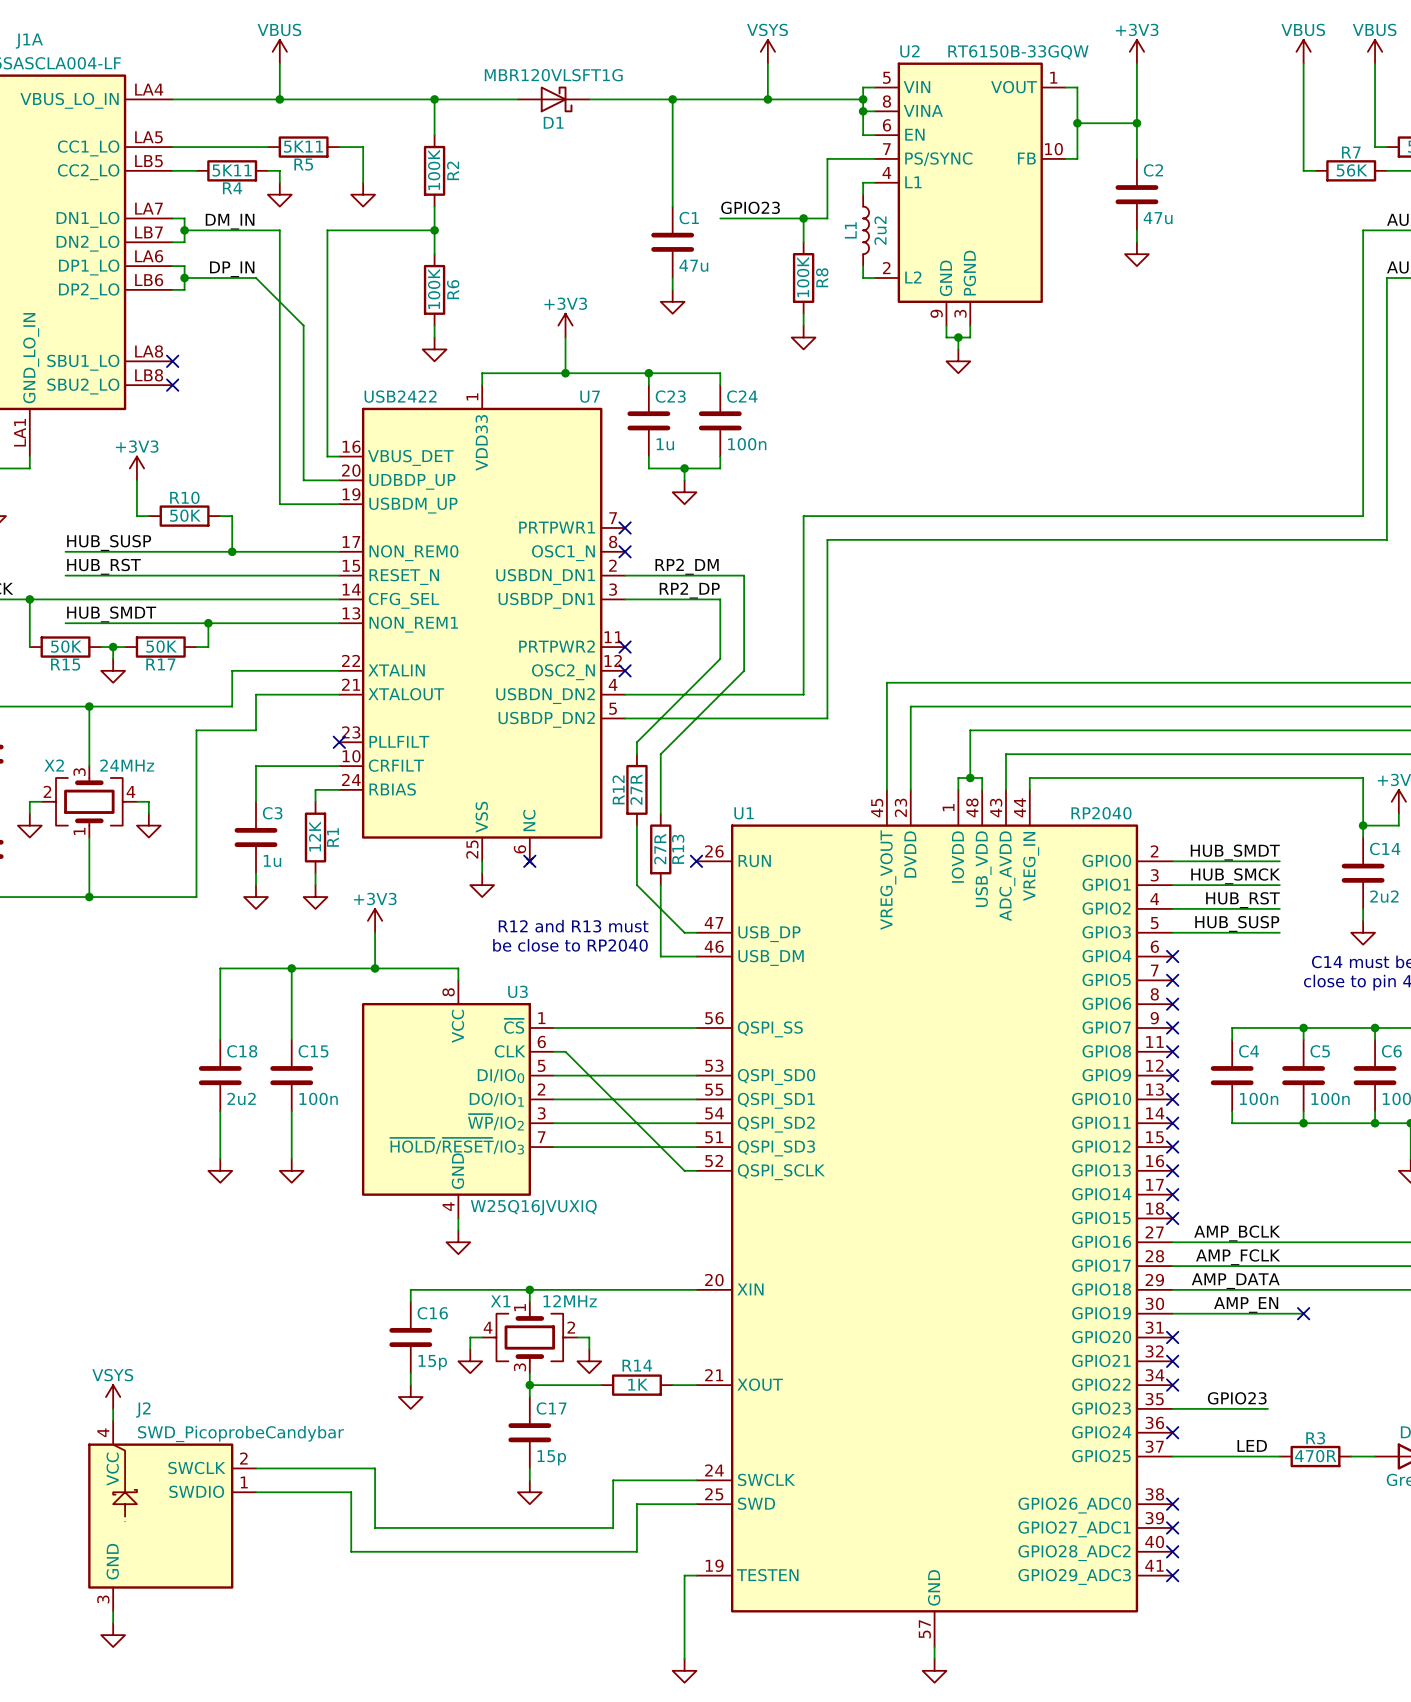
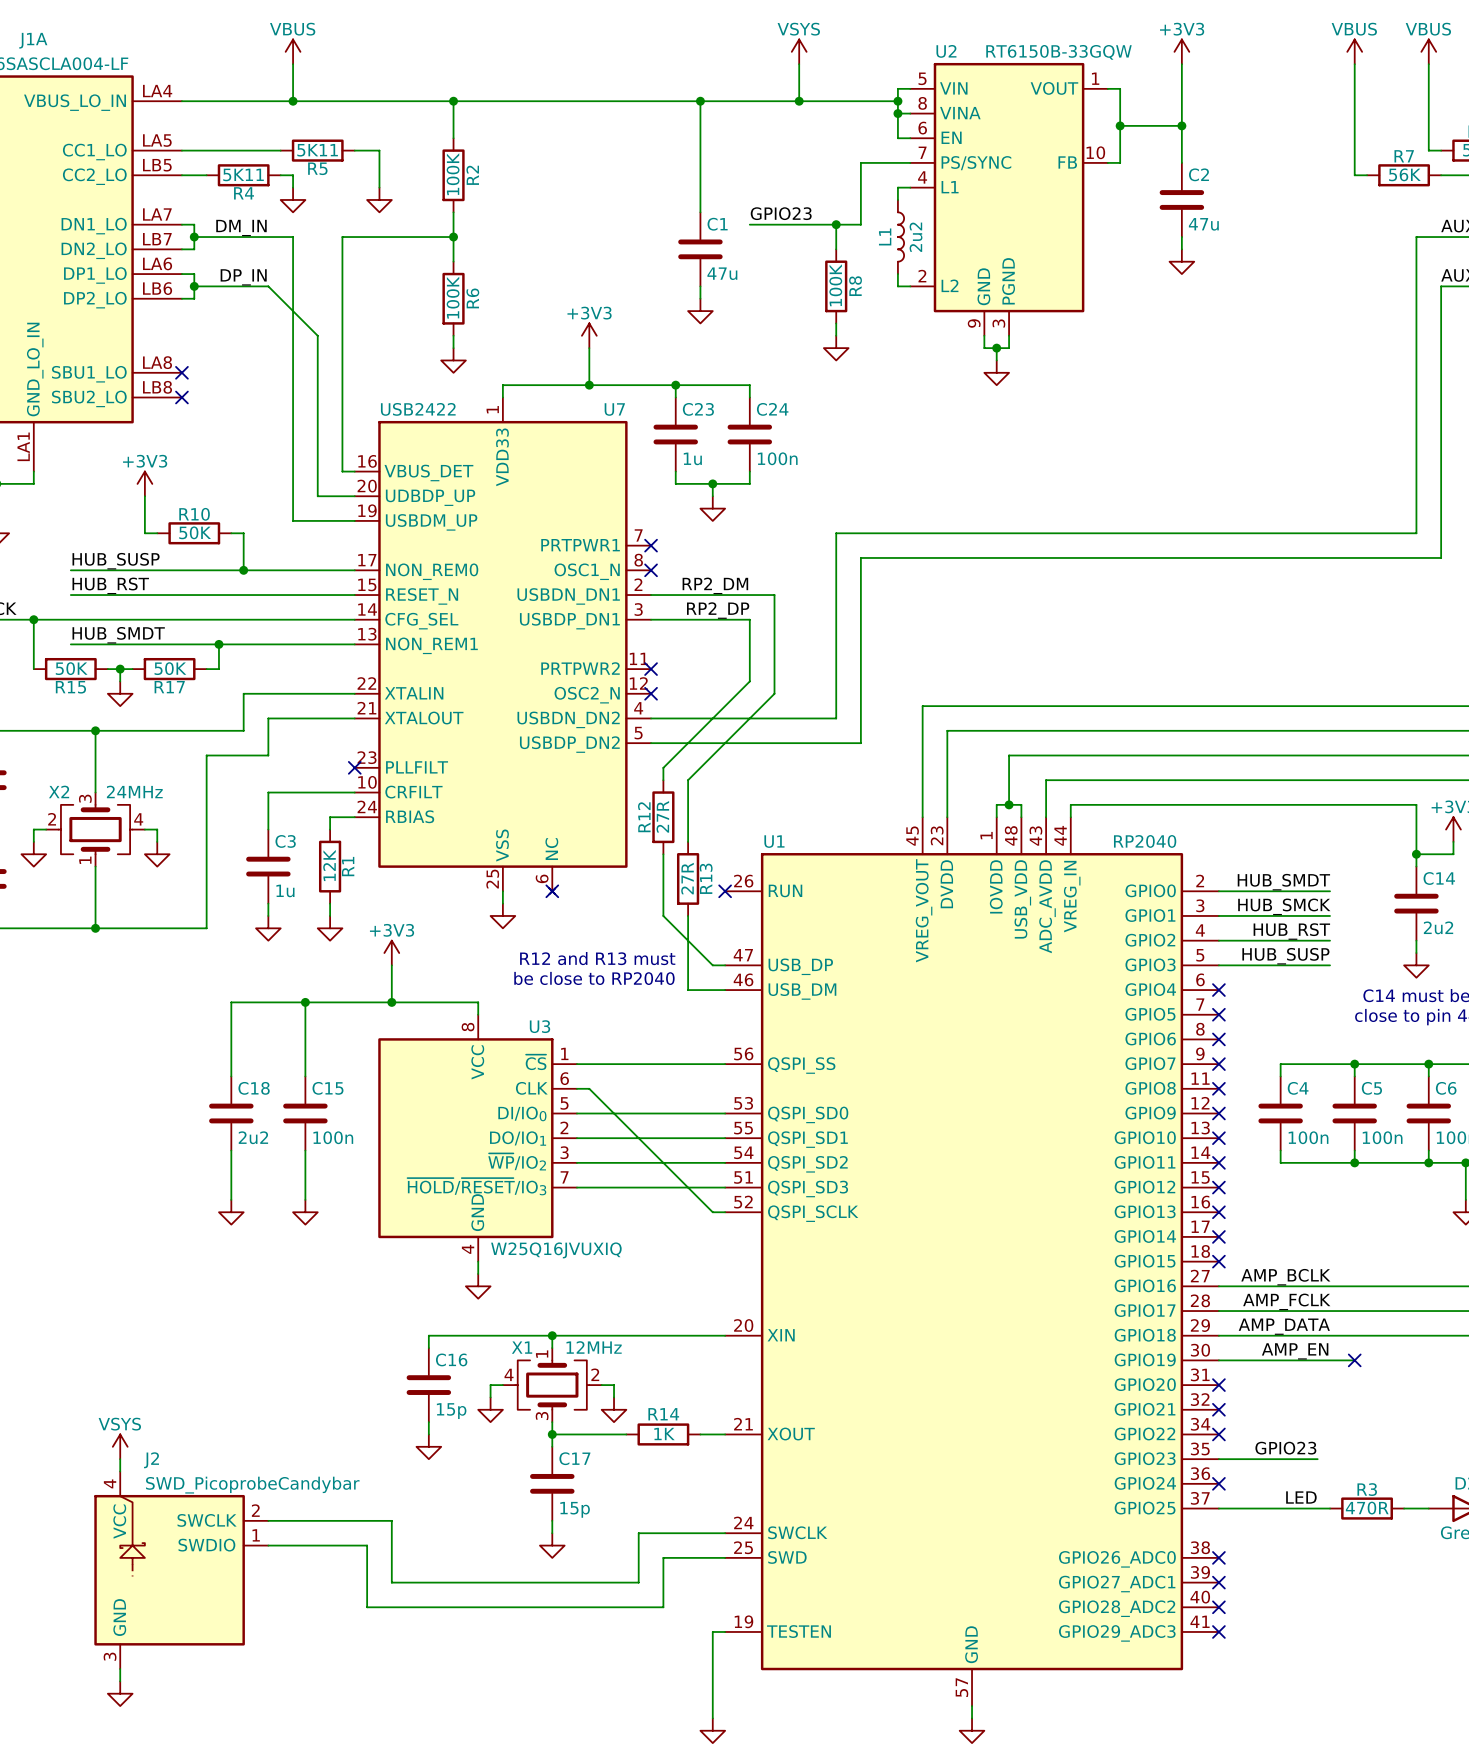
D1: MBR120VLSFT1G (553, 99) -> none

